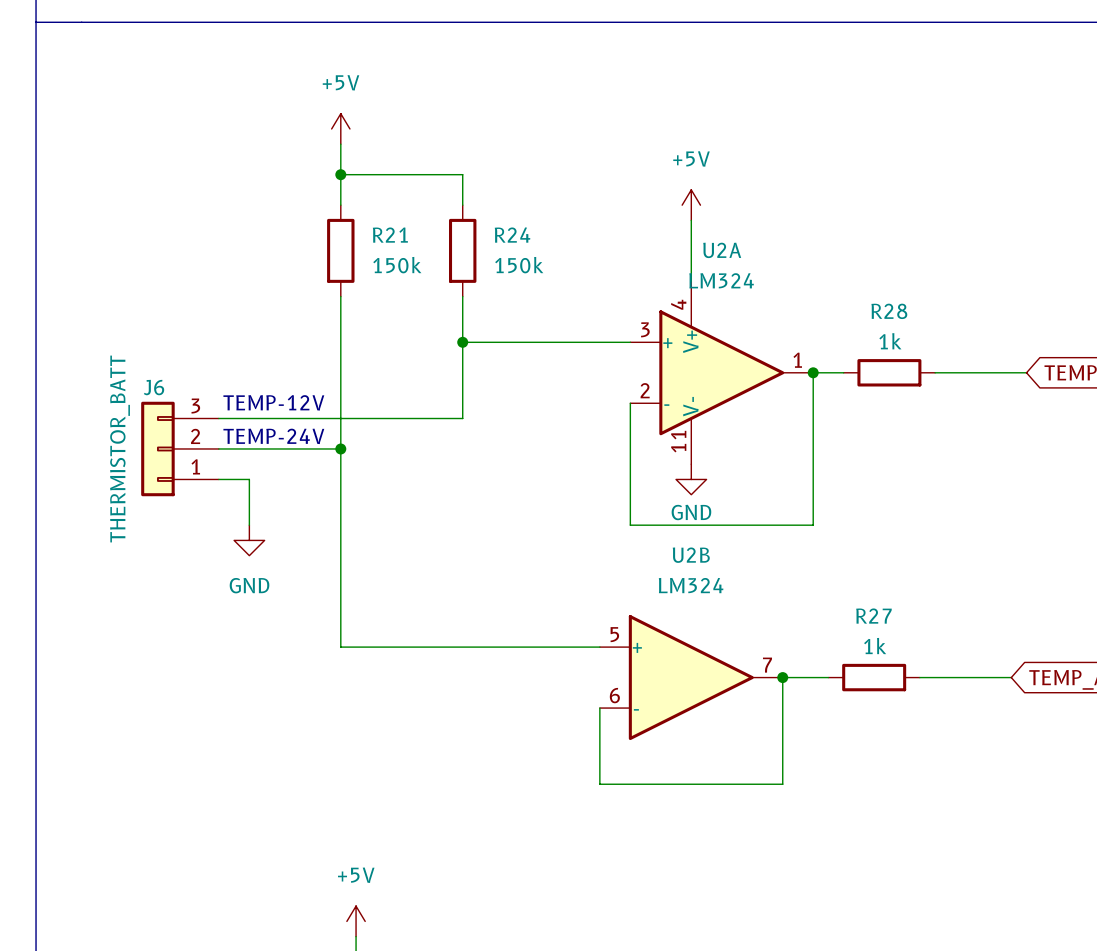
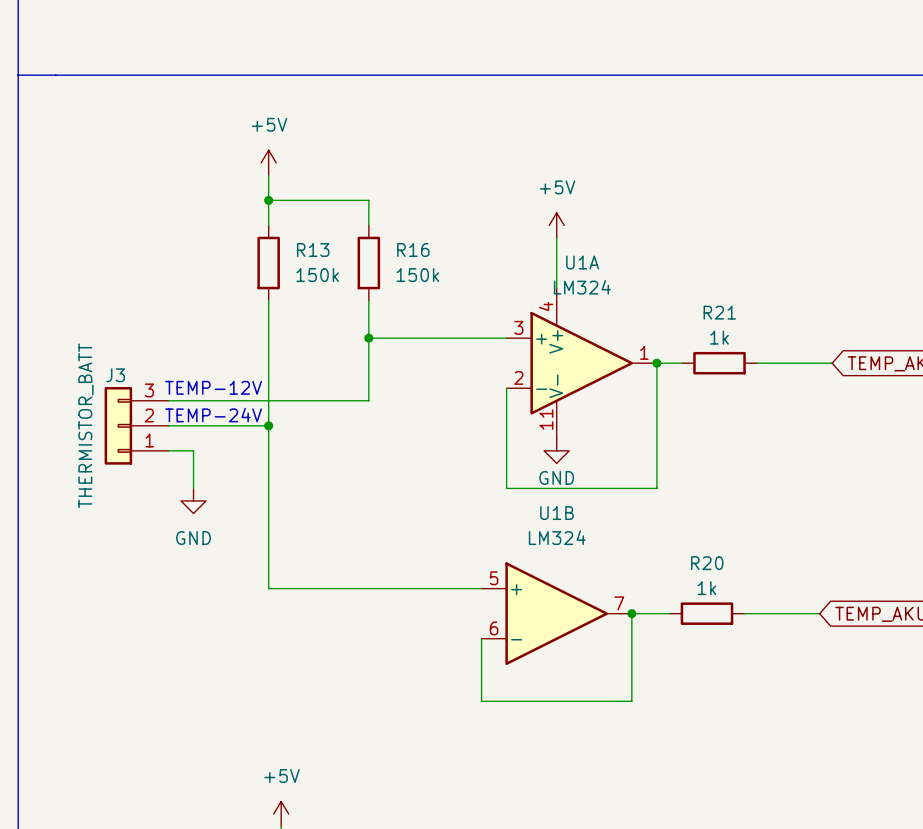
R21 name: R21 (390, 235) -> R13 (313, 250)
R24 name: R24 (512, 235) -> R16 (413, 250)
U2A name: U2A (722, 250) -> U1A (582, 262)
R28 name: R28 (889, 311) -> R21 (719, 312)
J6 name: J6 (154, 387) -> J3 (115, 375)
U2B name: U2B (691, 555) -> U1B (557, 513)
R27 name: R27 (873, 616) -> R20 (707, 563)

